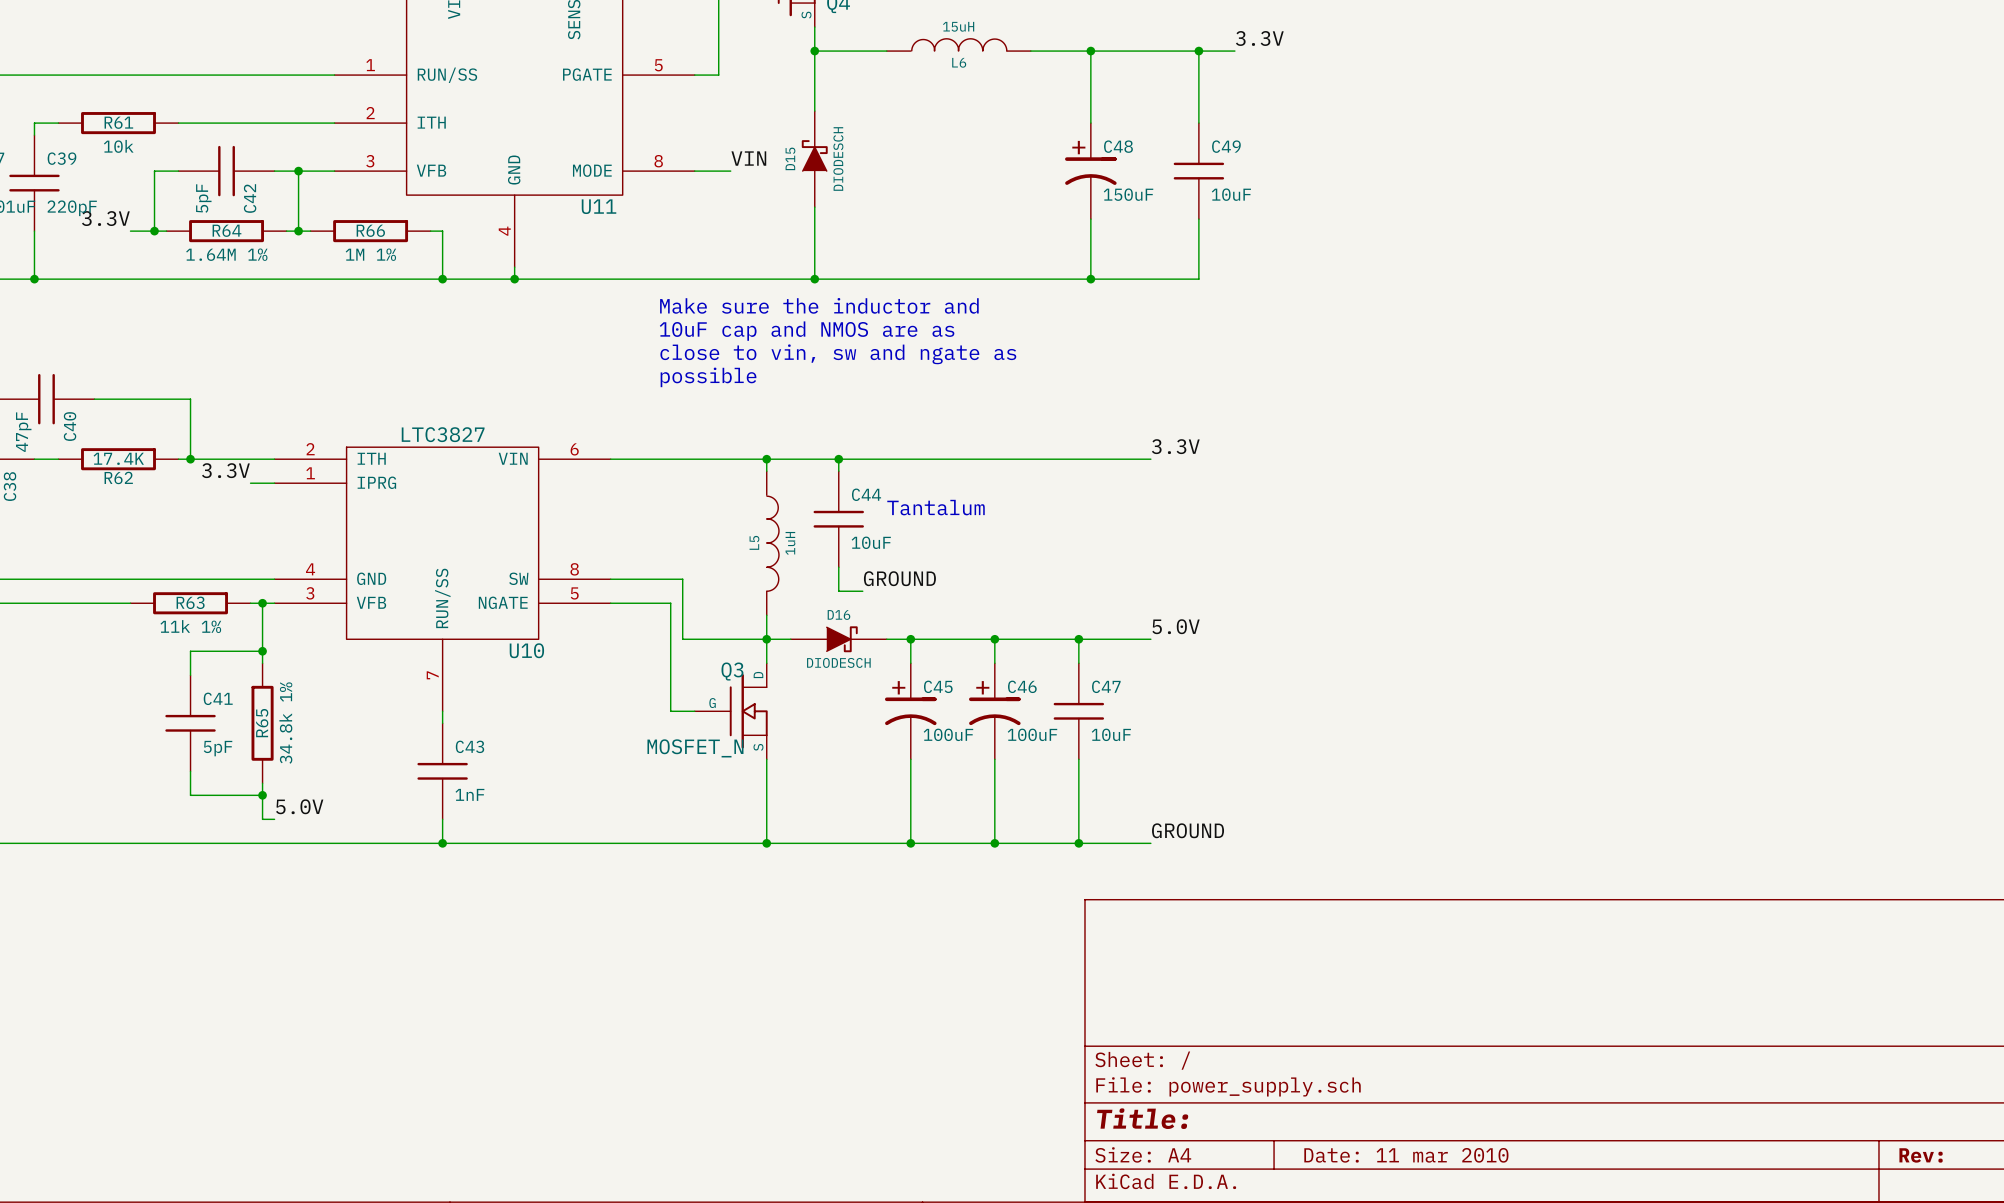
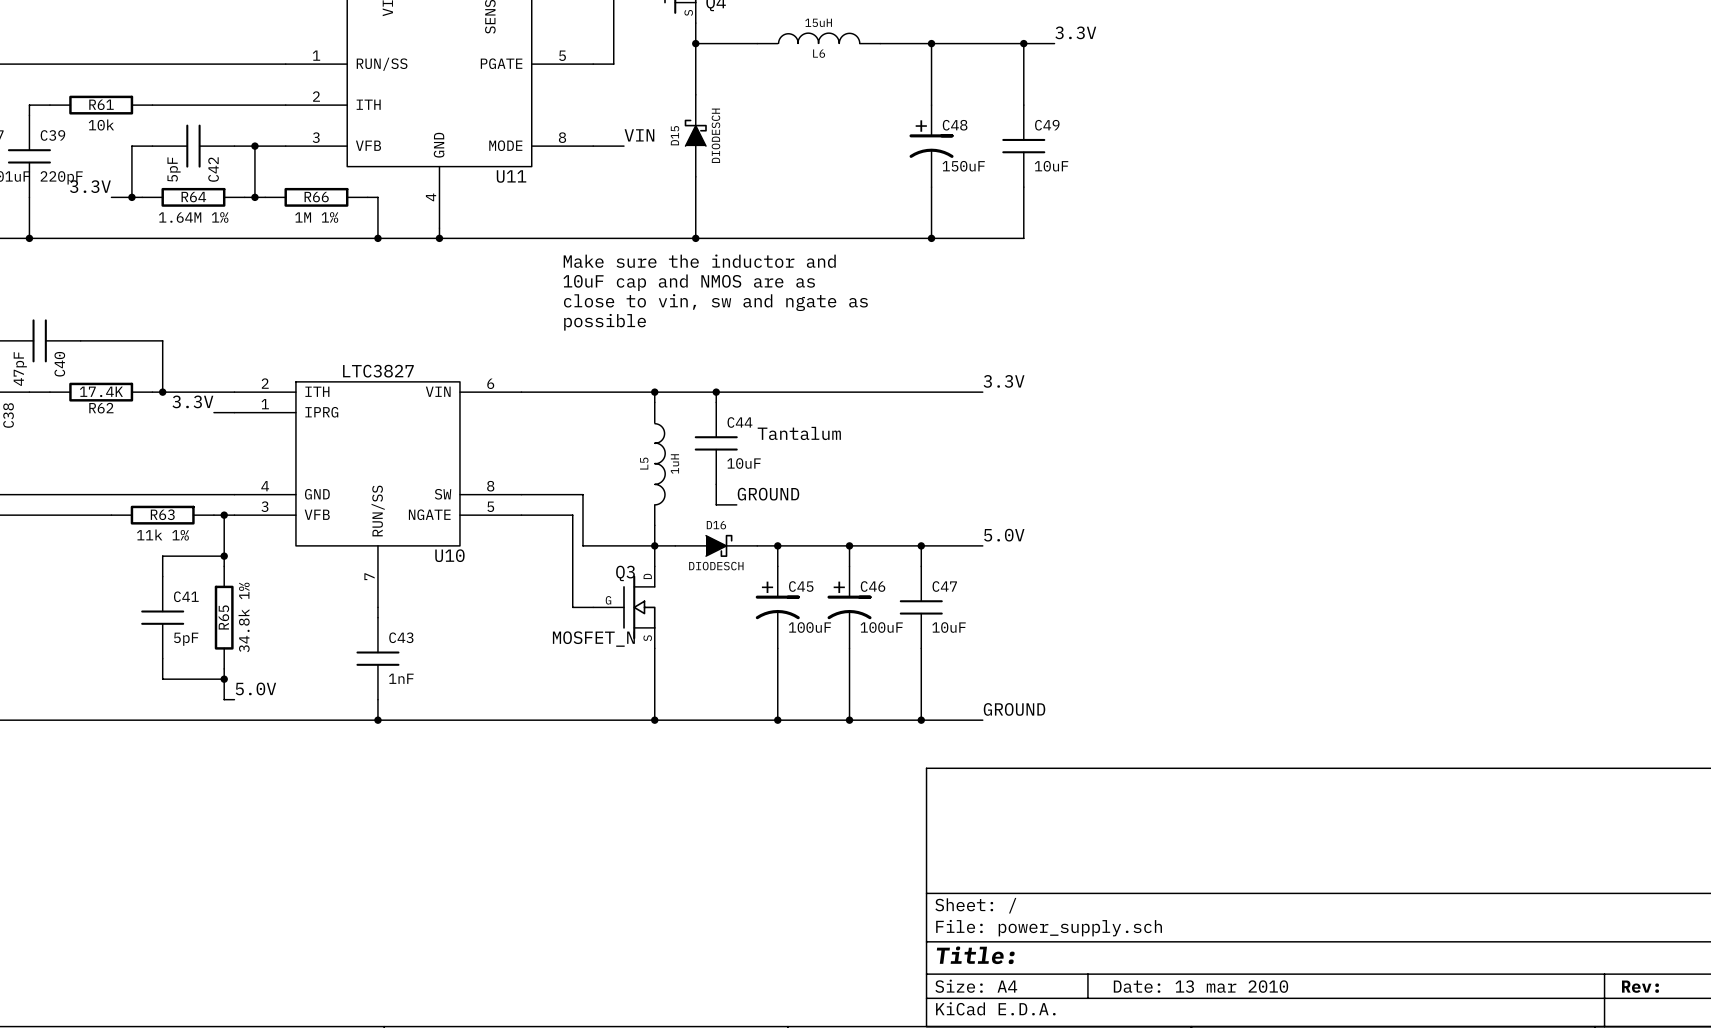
title block: Date: 11 mar 2010 (1406, 1155) -> Date: 13 mar 2010 (1200, 986)

